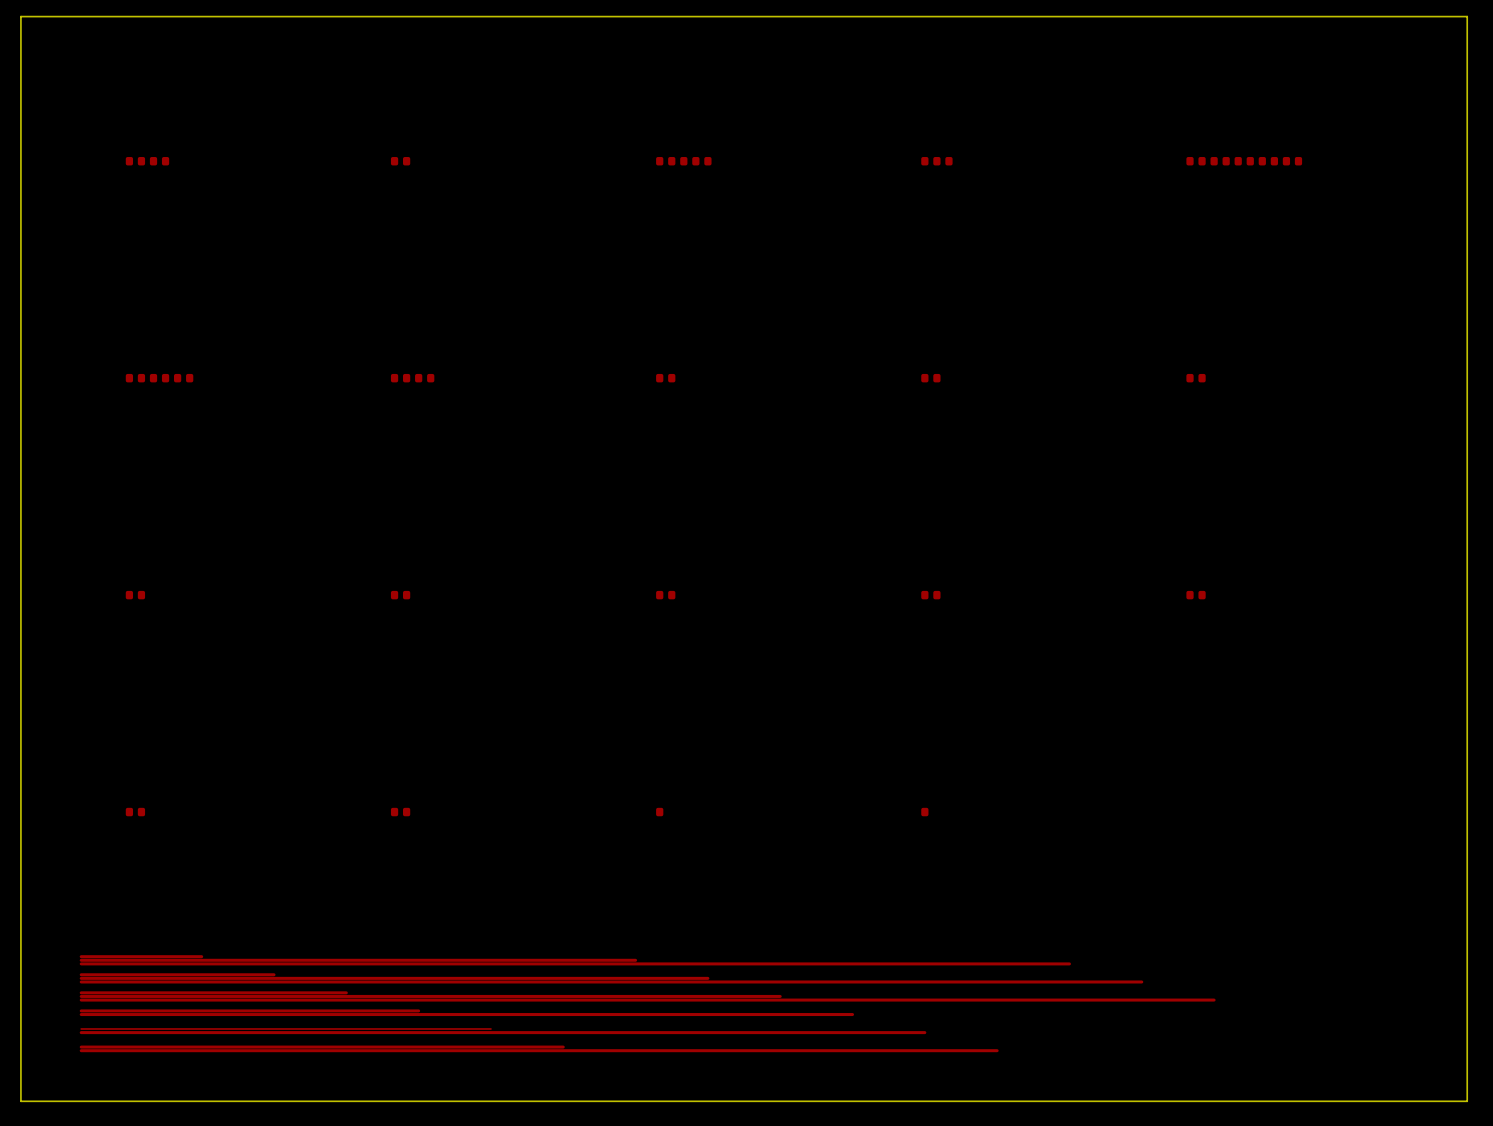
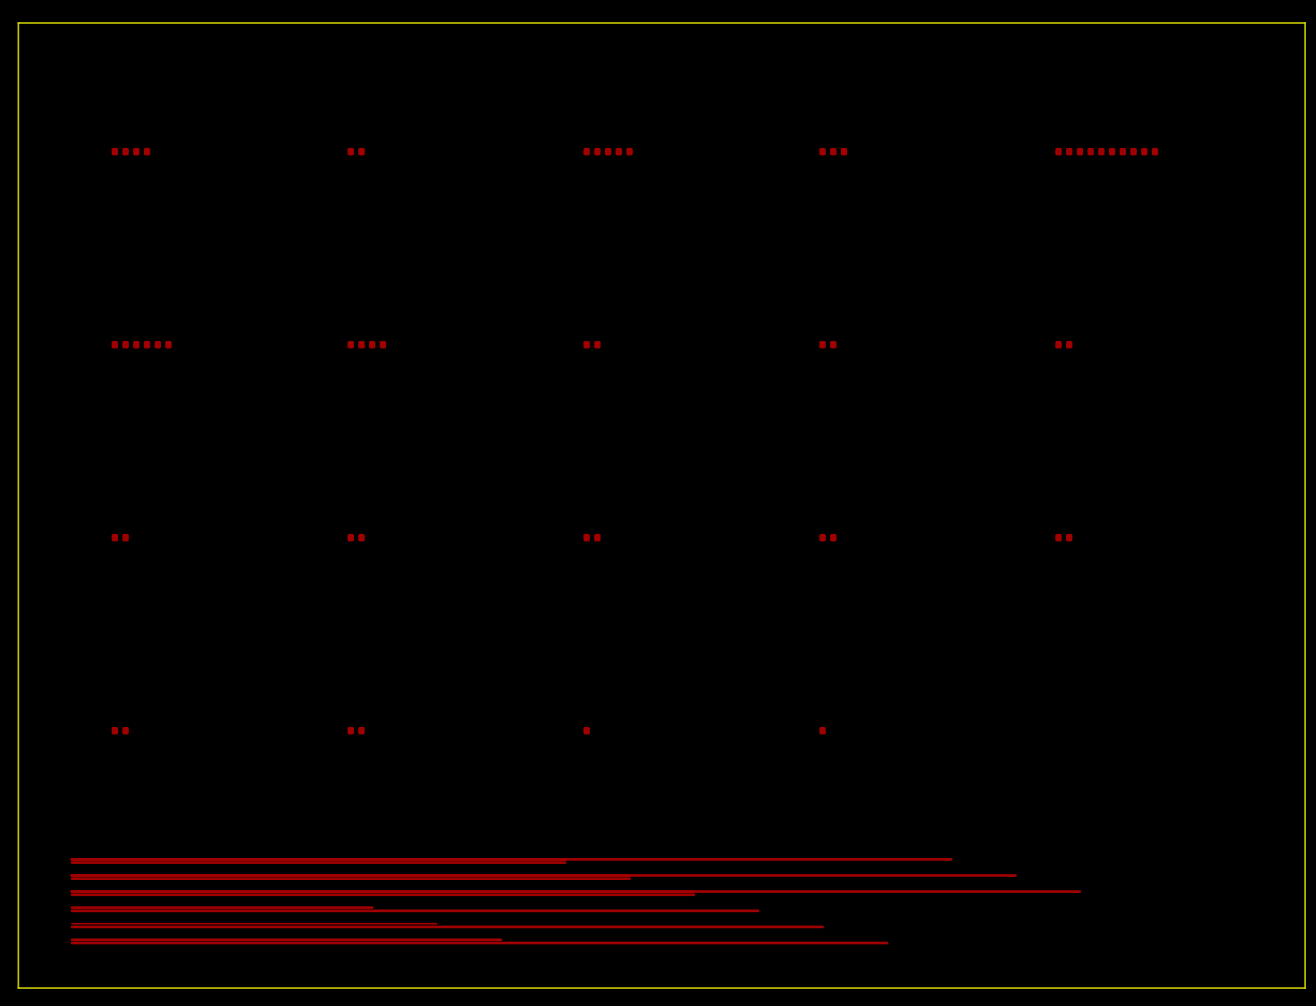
top track: none -> (179, 859) (951, 859)
top track: (81, 963) (1069, 963) -> none
top track: none -> (243, 875) (1015, 875)
top track: (81, 981) (1141, 981) -> none
top track: none -> (307, 891) (1079, 891)
top track: (81, 1000) (1214, 1000) -> none

